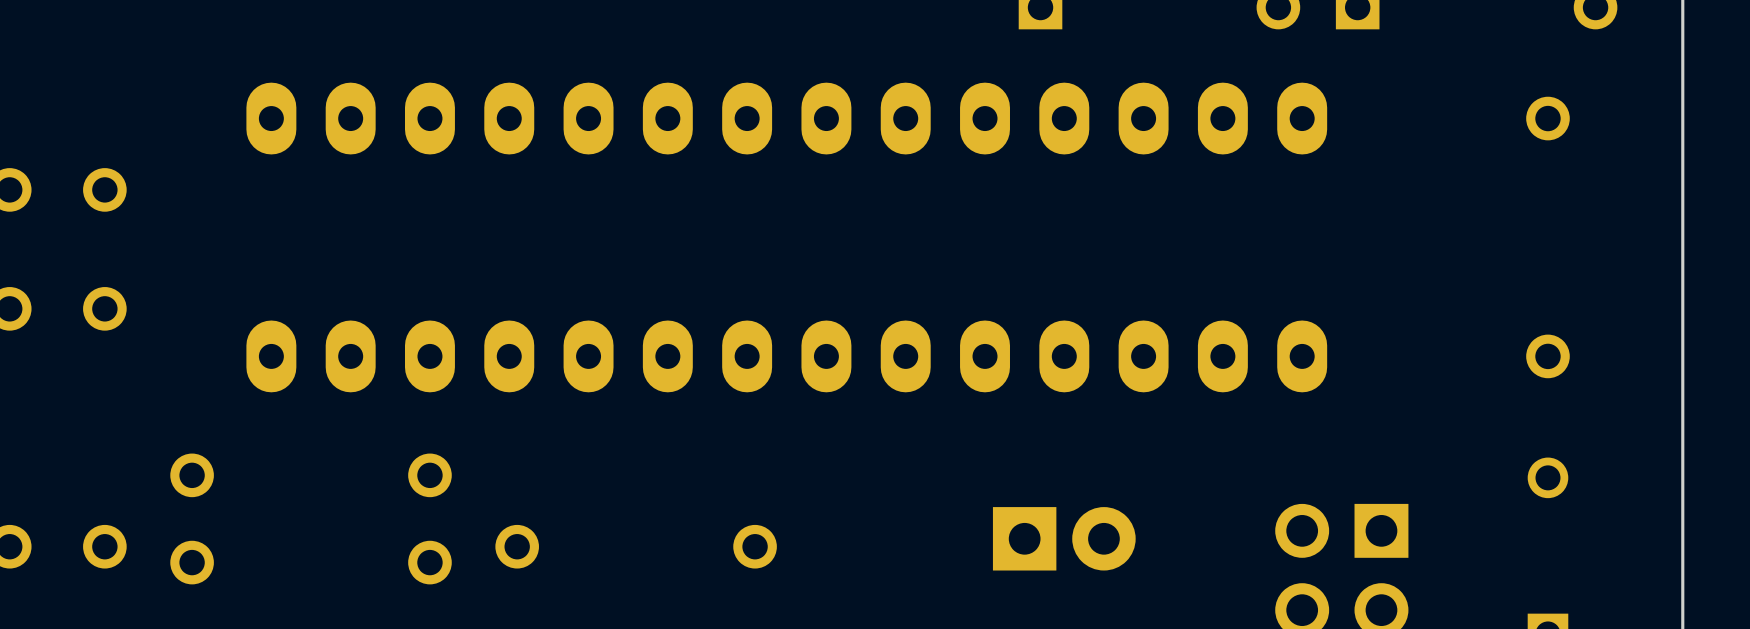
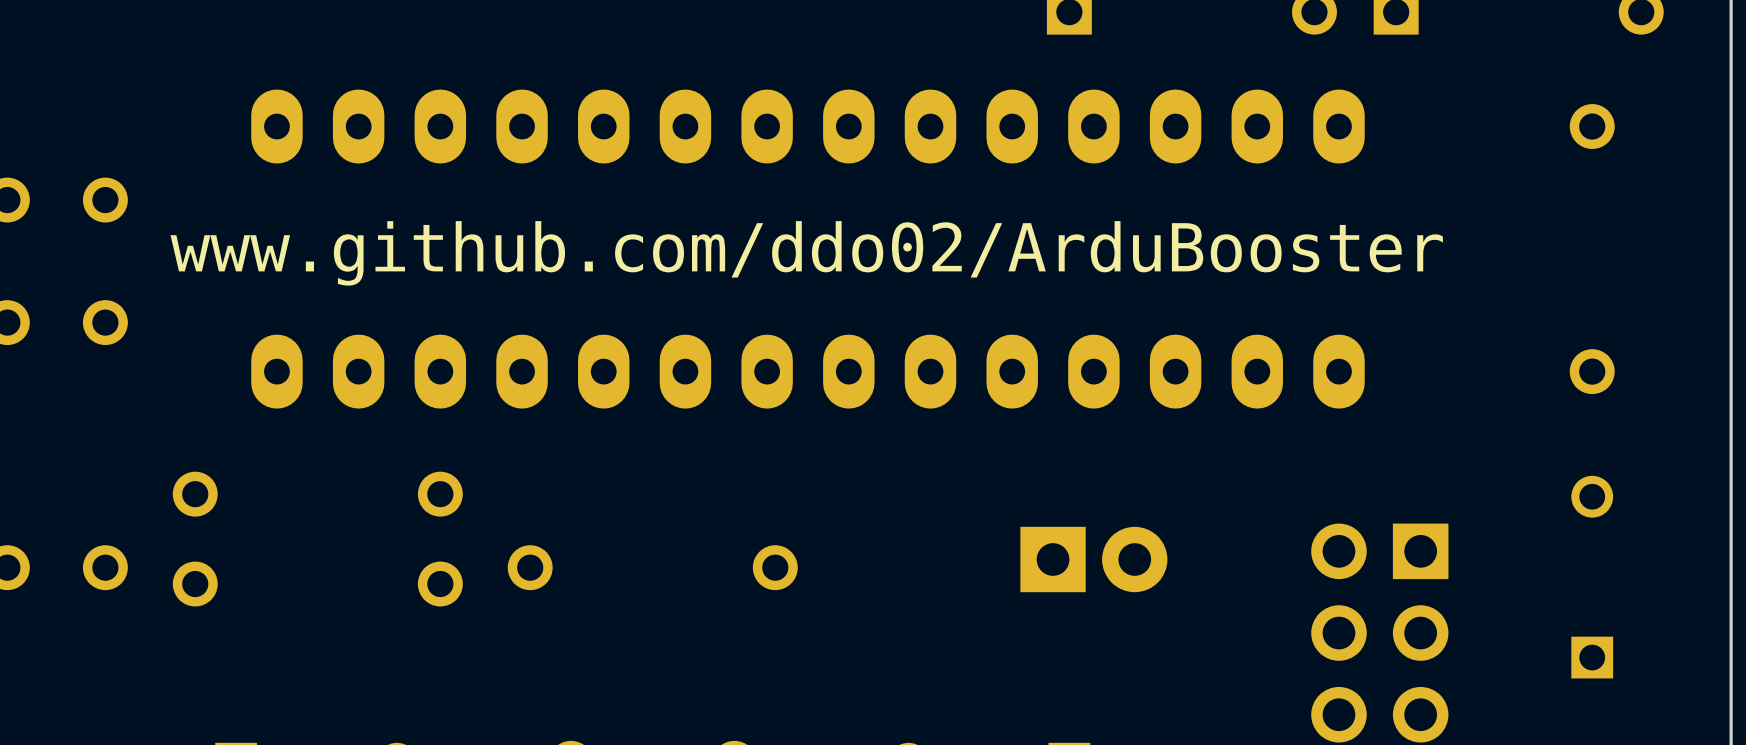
text: none -> www.github.com/ddo02/ArduBooster (806, 253)

